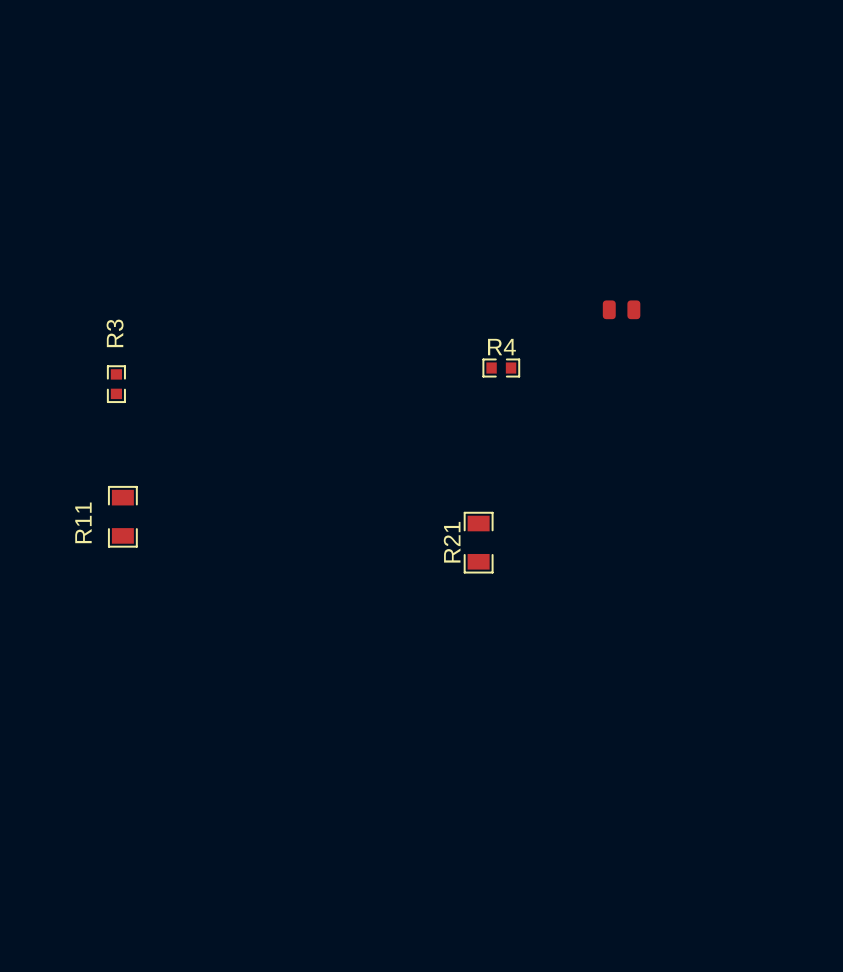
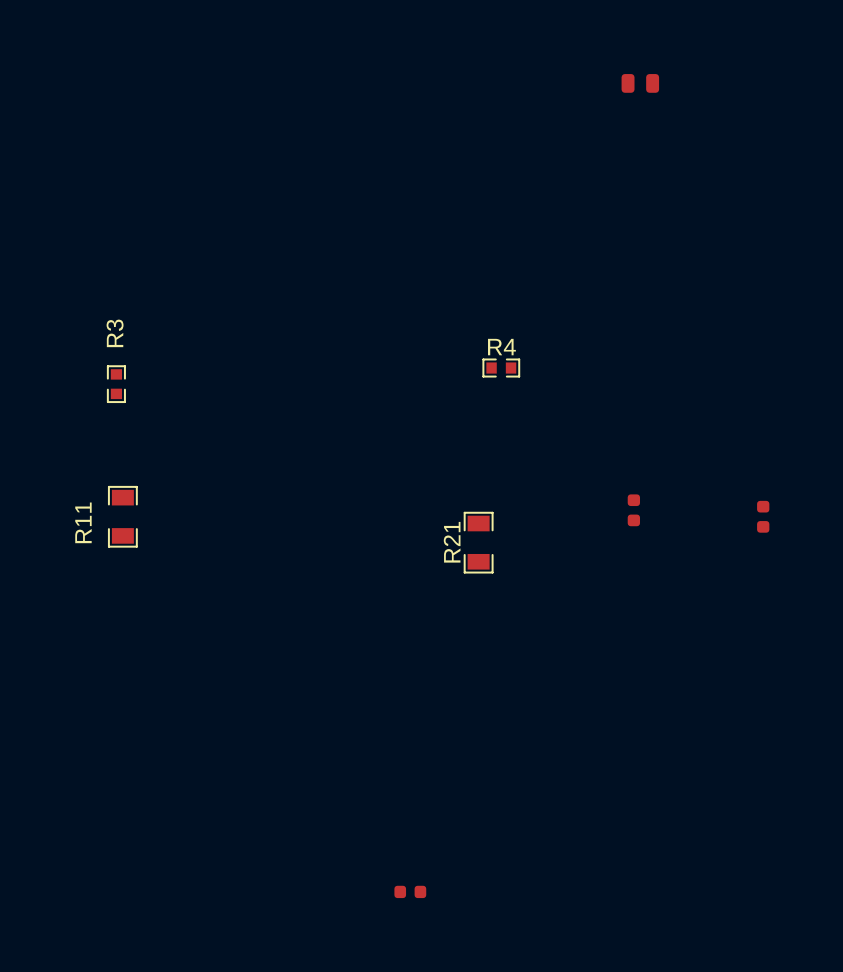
part position: (621, 309) -> (640, 83)
part: none -> (633, 510)
part: none -> (763, 516)
part: none -> (410, 891)

